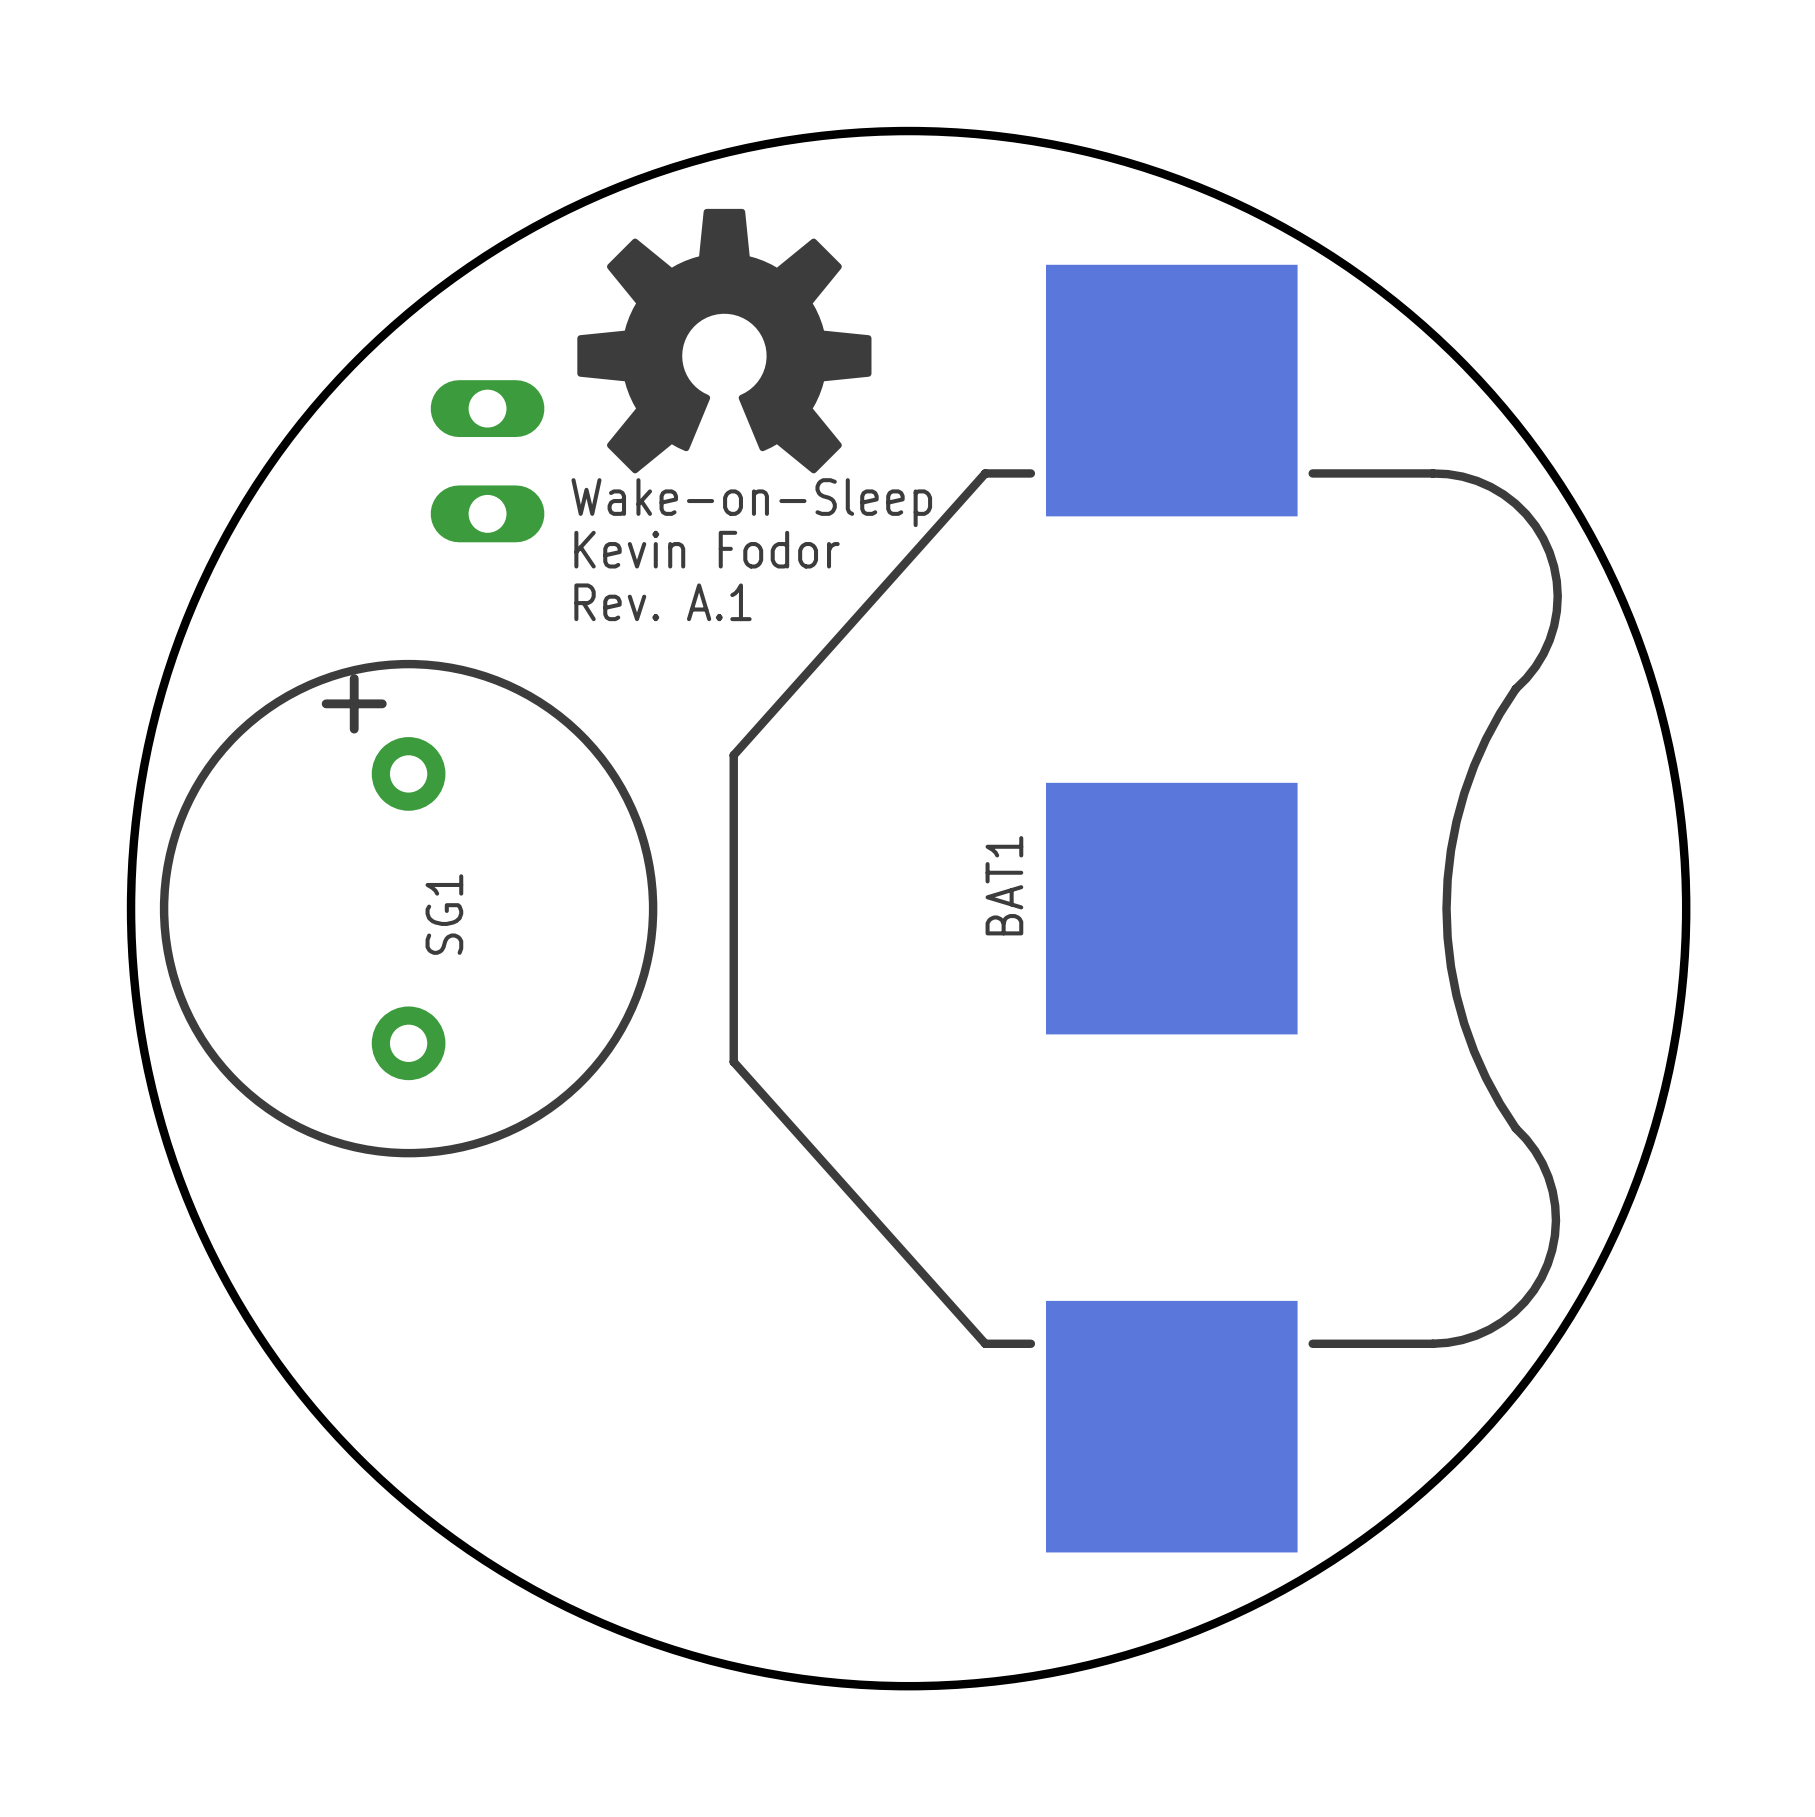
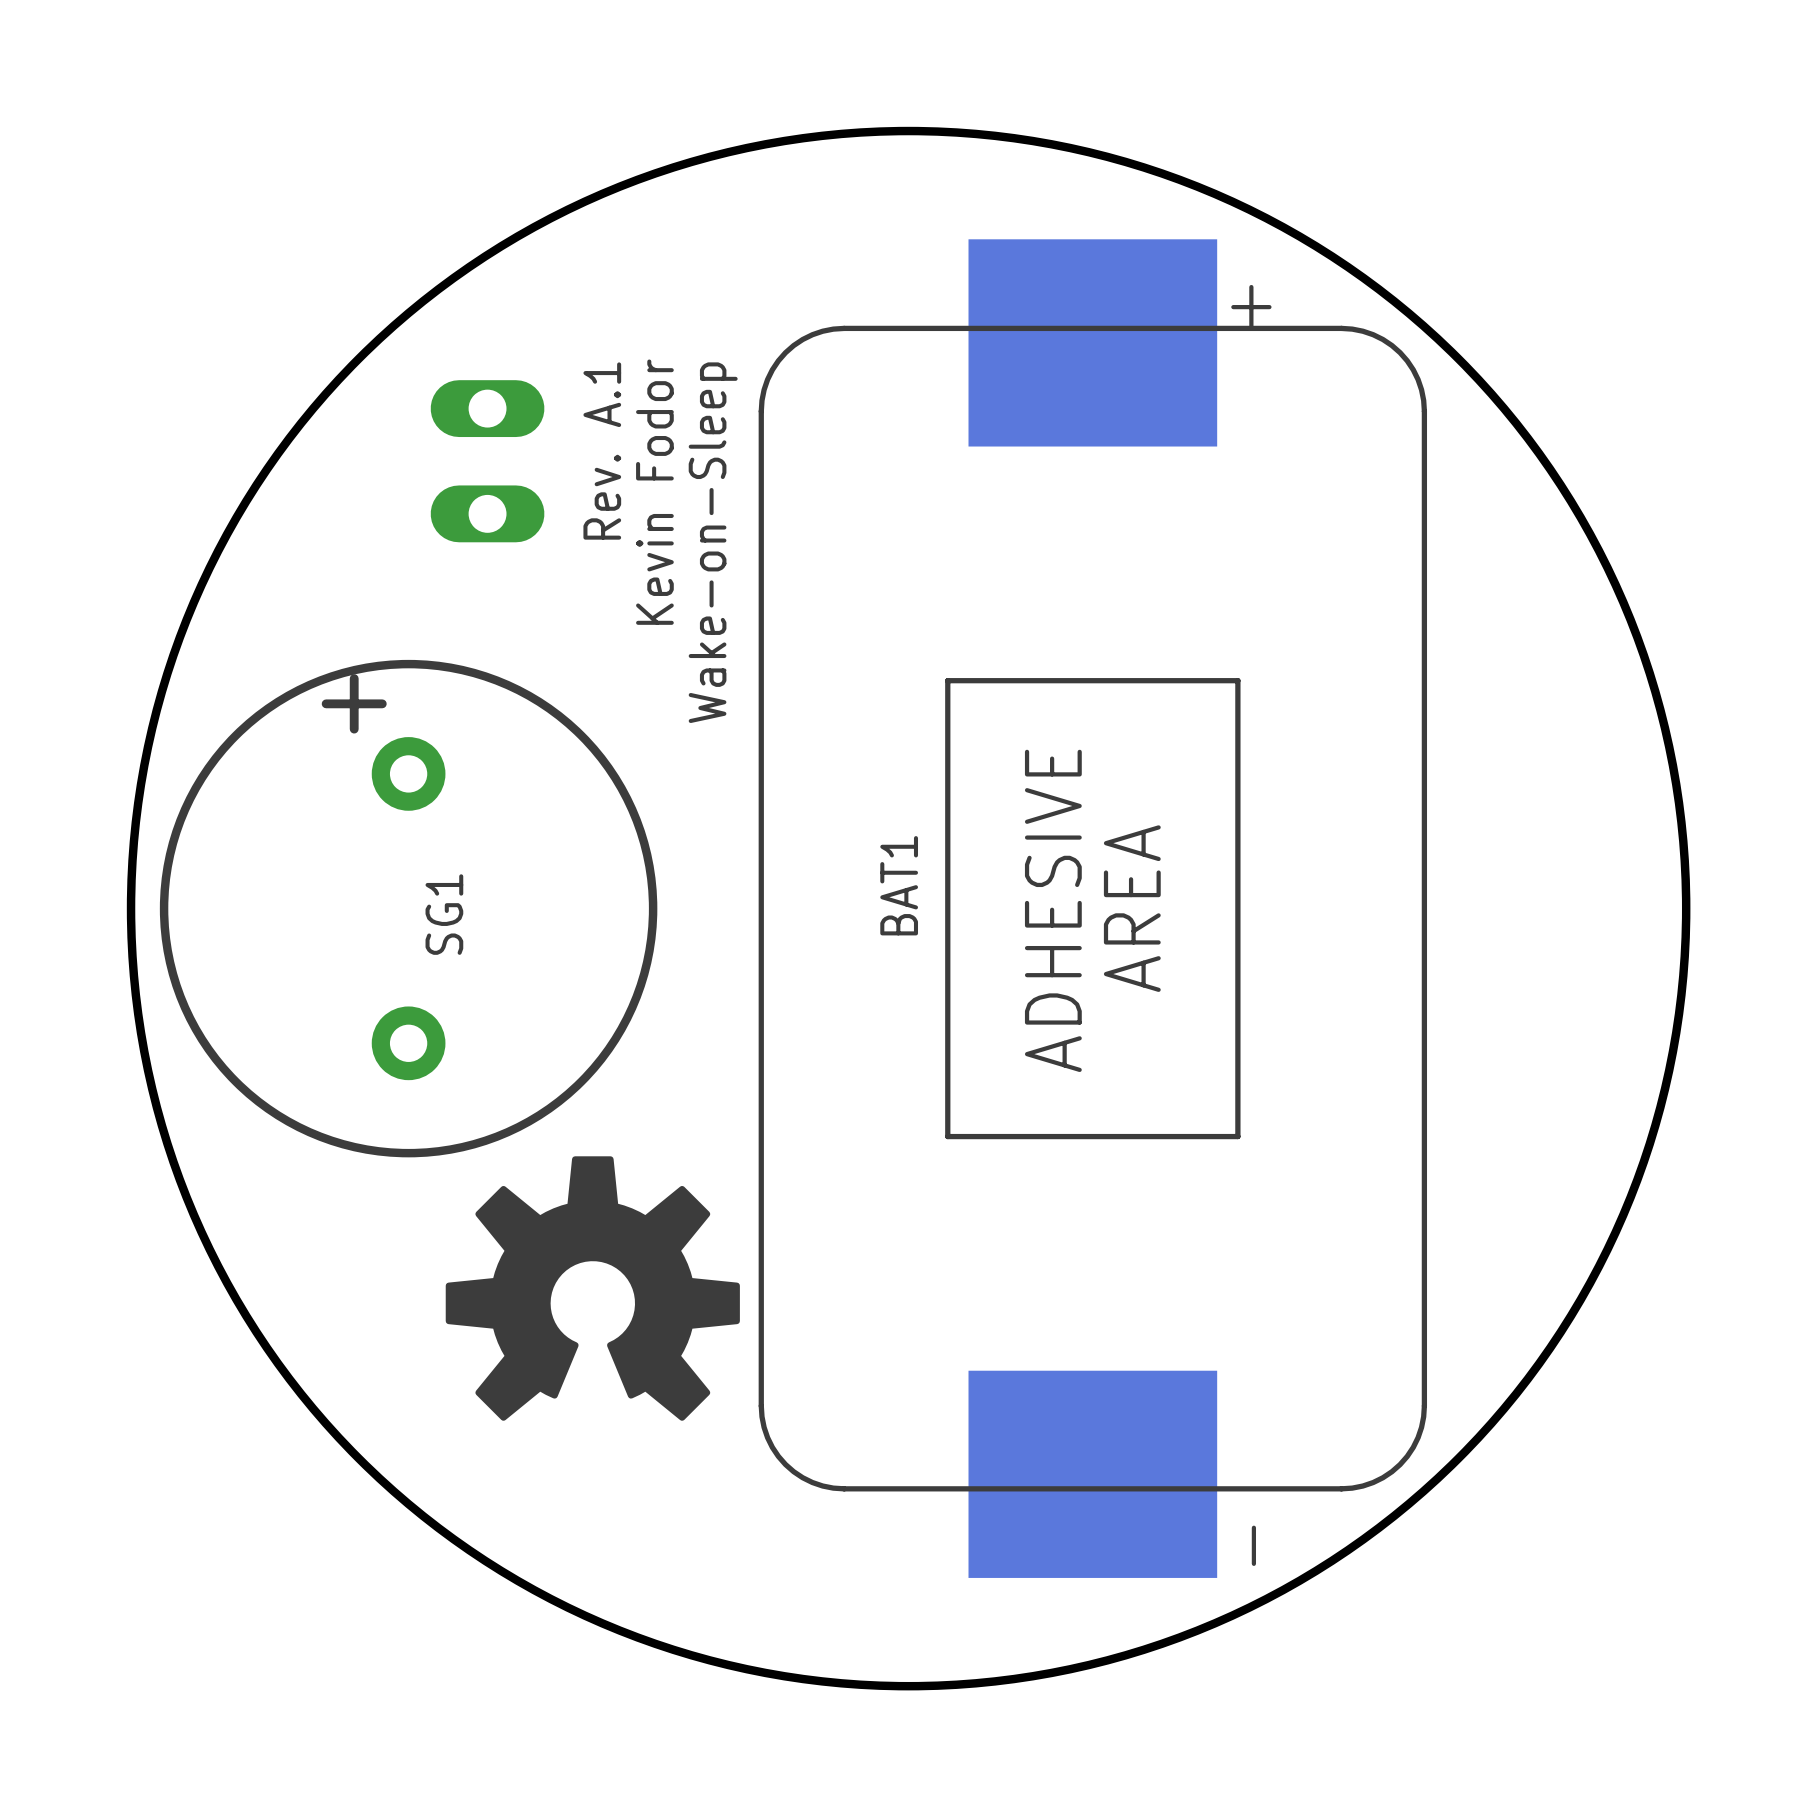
BAT1 footprint: [729, 264, 1562, 1553] -> [758, 239, 1428, 1578]
drawing position: (724, 341) -> (592, 1288)
text rotation: 0° (751, 502) -> 90° counterclockwise (713, 542)
text rotation: 0° (707, 549) -> 90° counterclockwise (654, 492)
text rotation: 0° (663, 602) -> 90° counterclockwise (602, 451)

